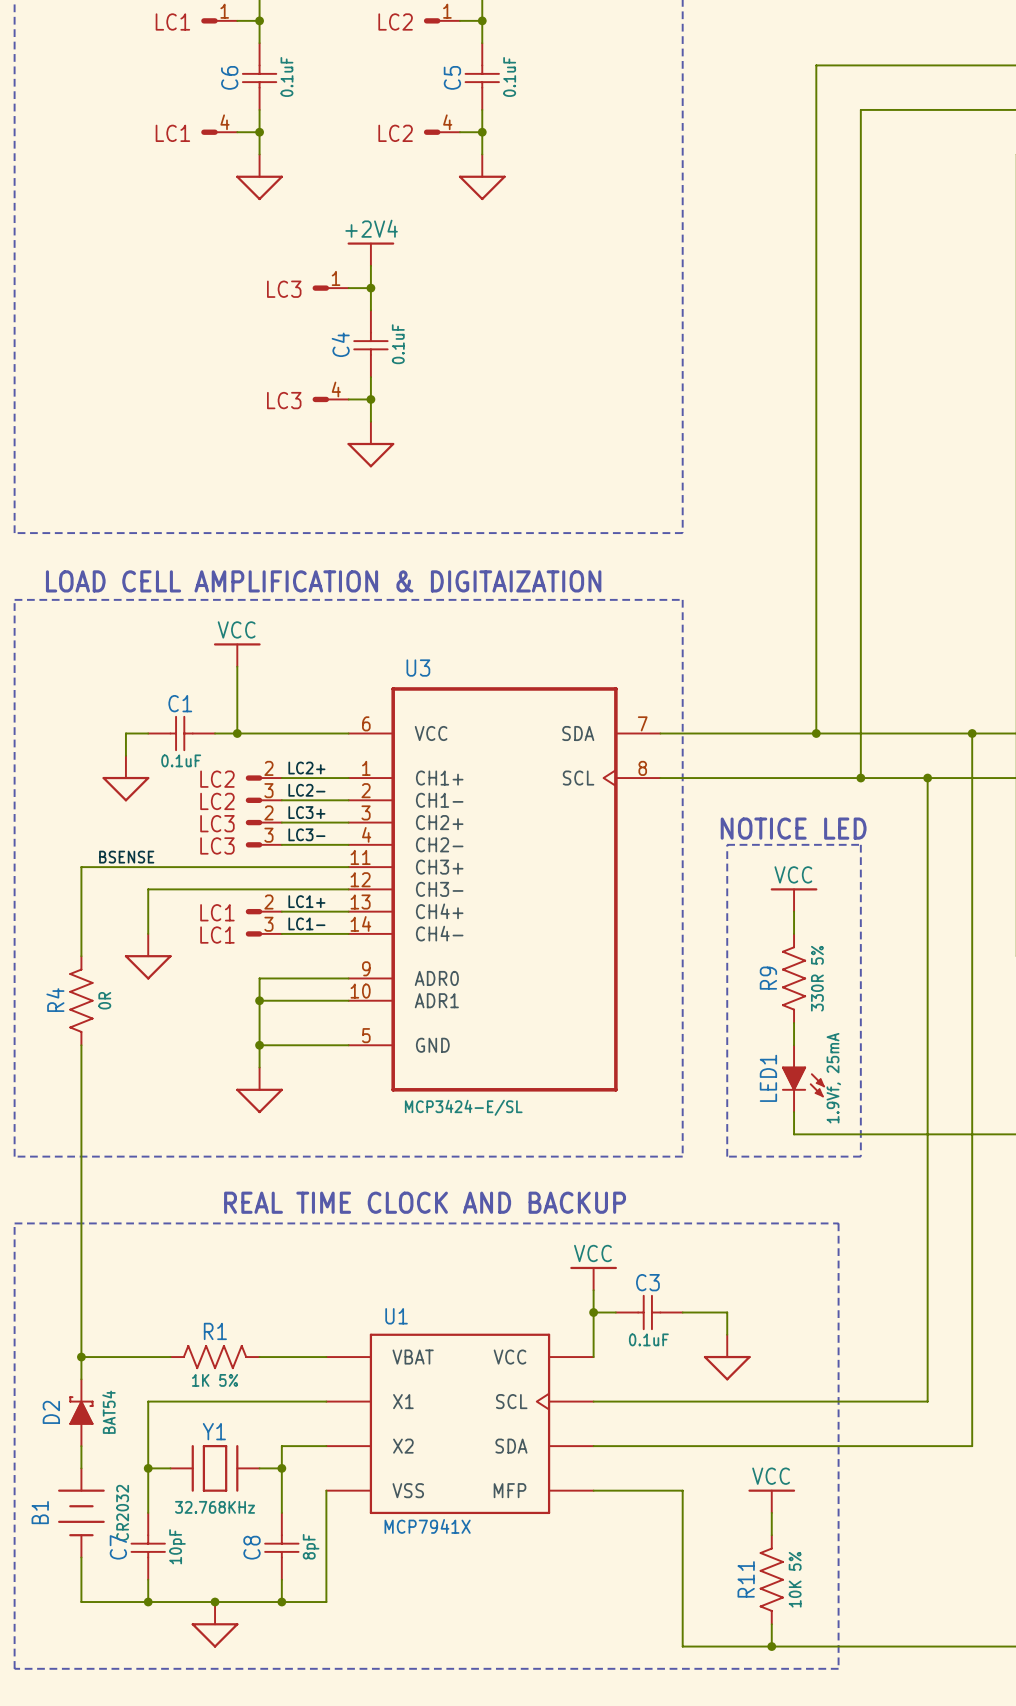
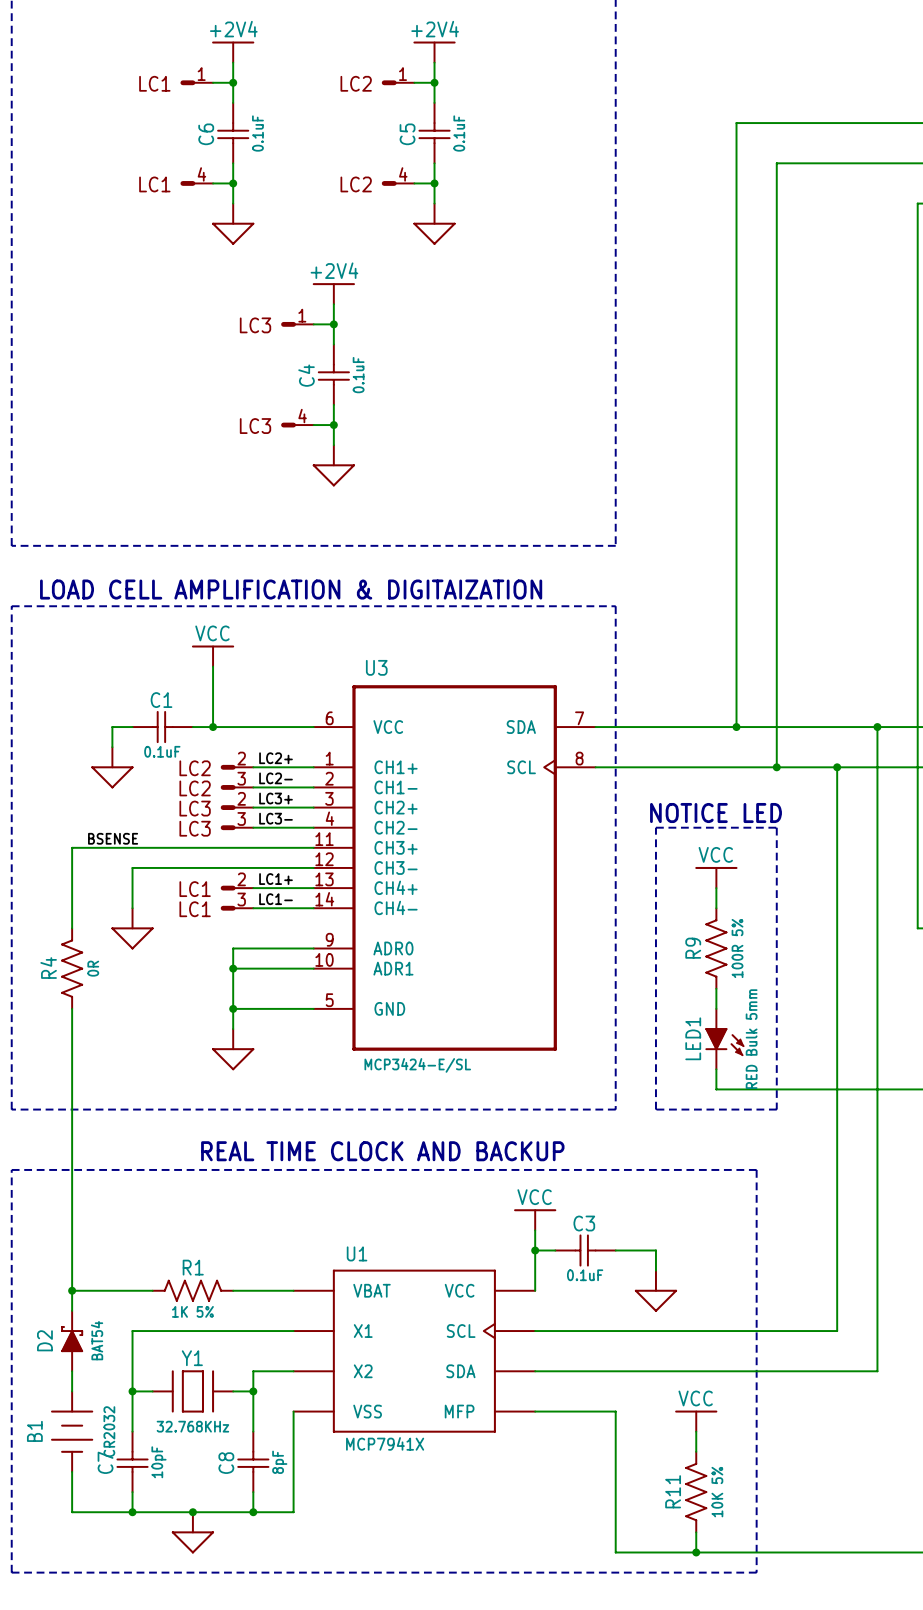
R9 value: 330R 5% (817, 978) -> 100R 5% (737, 948)
LED1 value: 1.9Vf, 25mA (833, 1078) -> RED Bulk 5mm (751, 1039)

